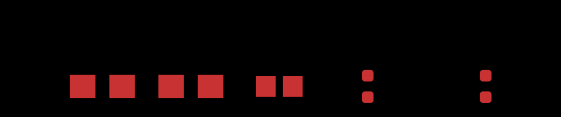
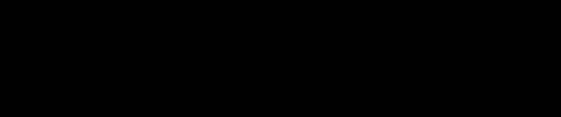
part: (102, 86) -> none
part: (190, 86) -> none
part: (279, 86) -> none
part: (367, 86) -> none
part: (485, 86) -> none

